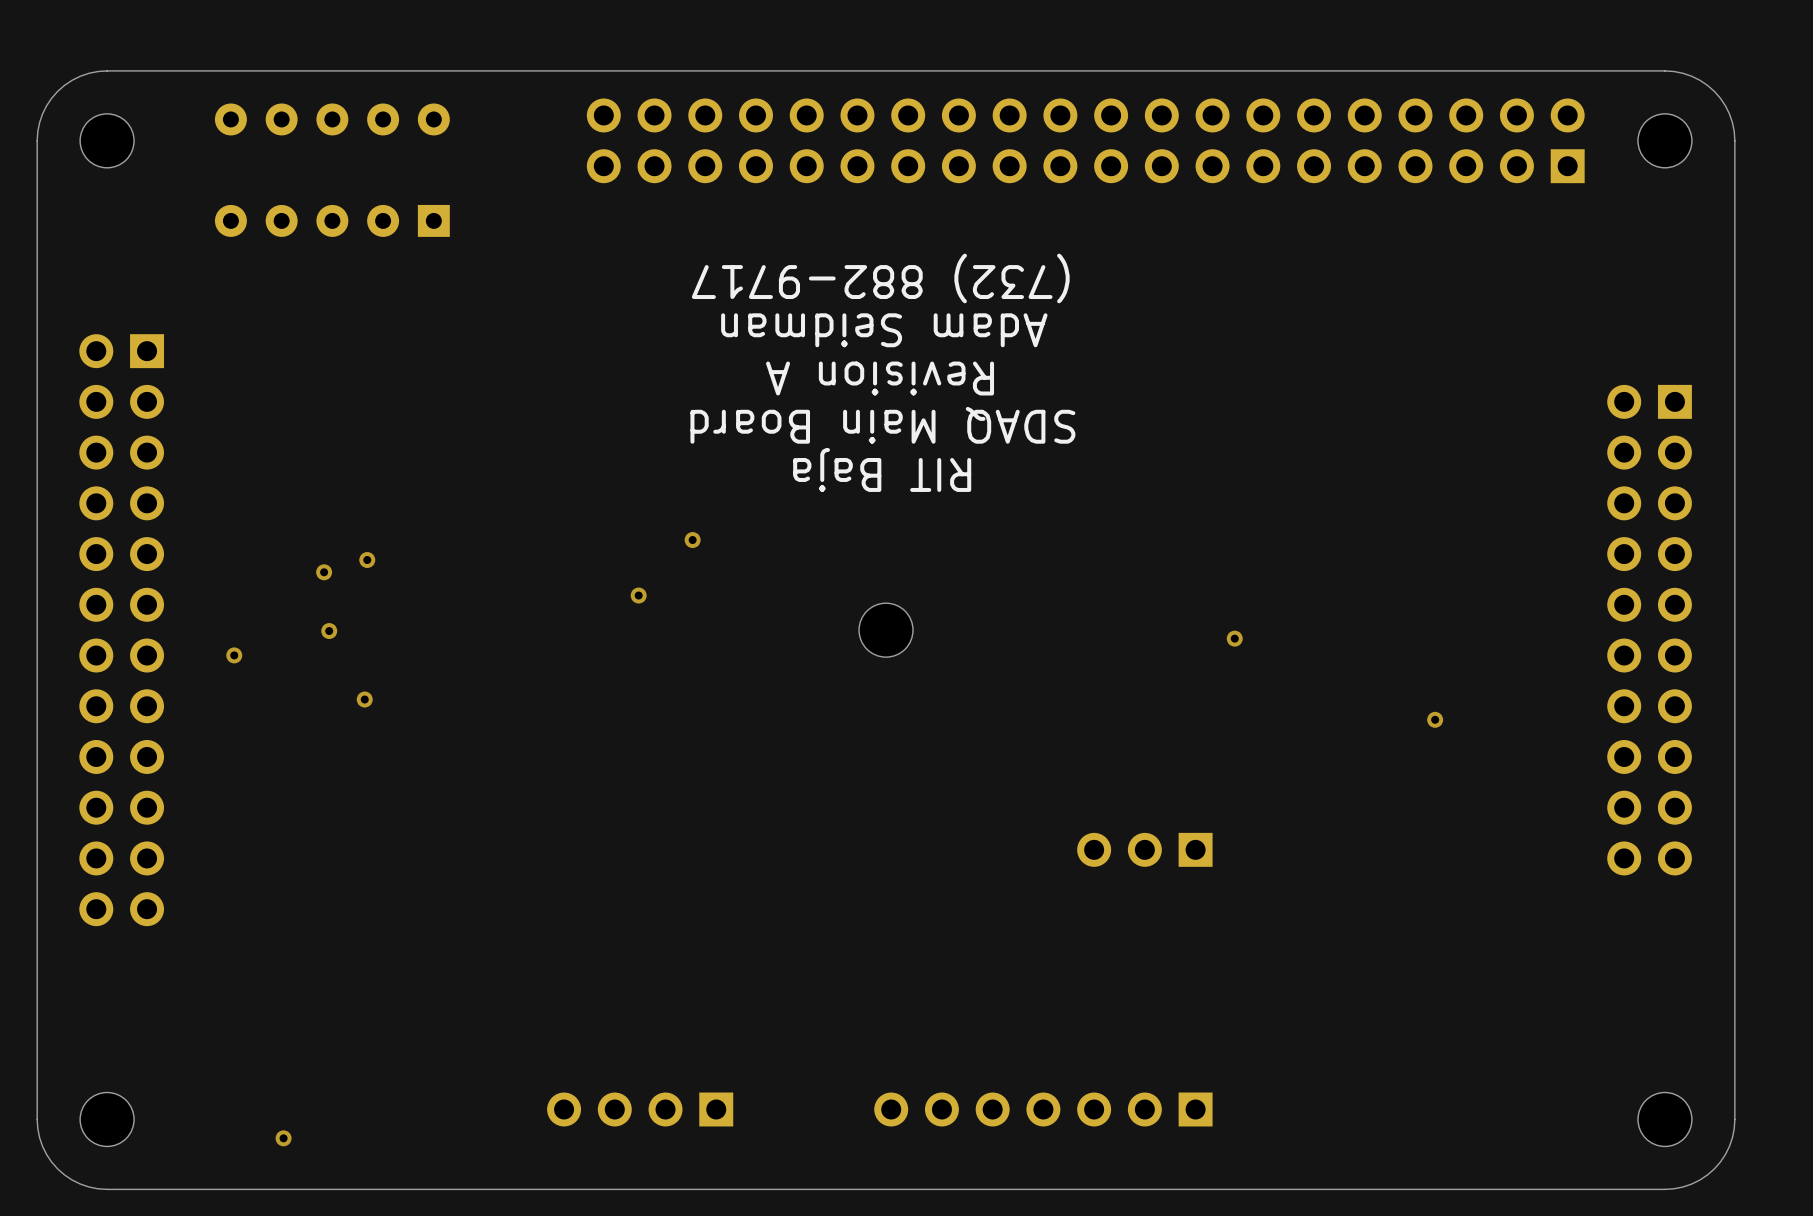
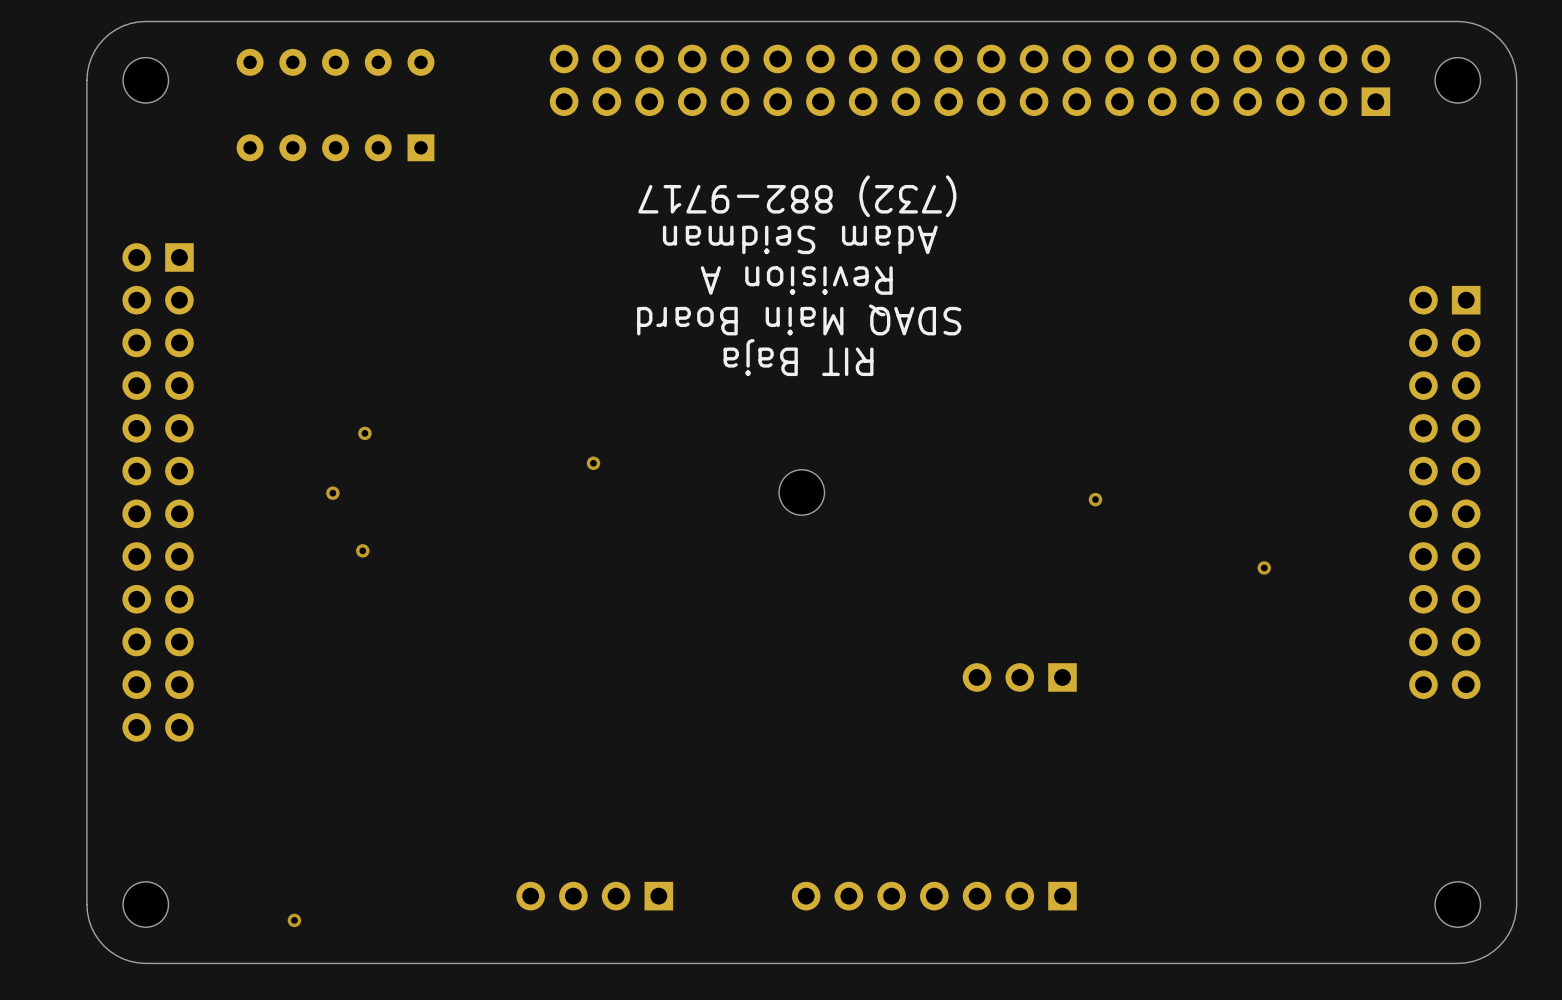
via: (692, 540) -> none
via: (324, 572) -> none
via: (234, 655) -> none

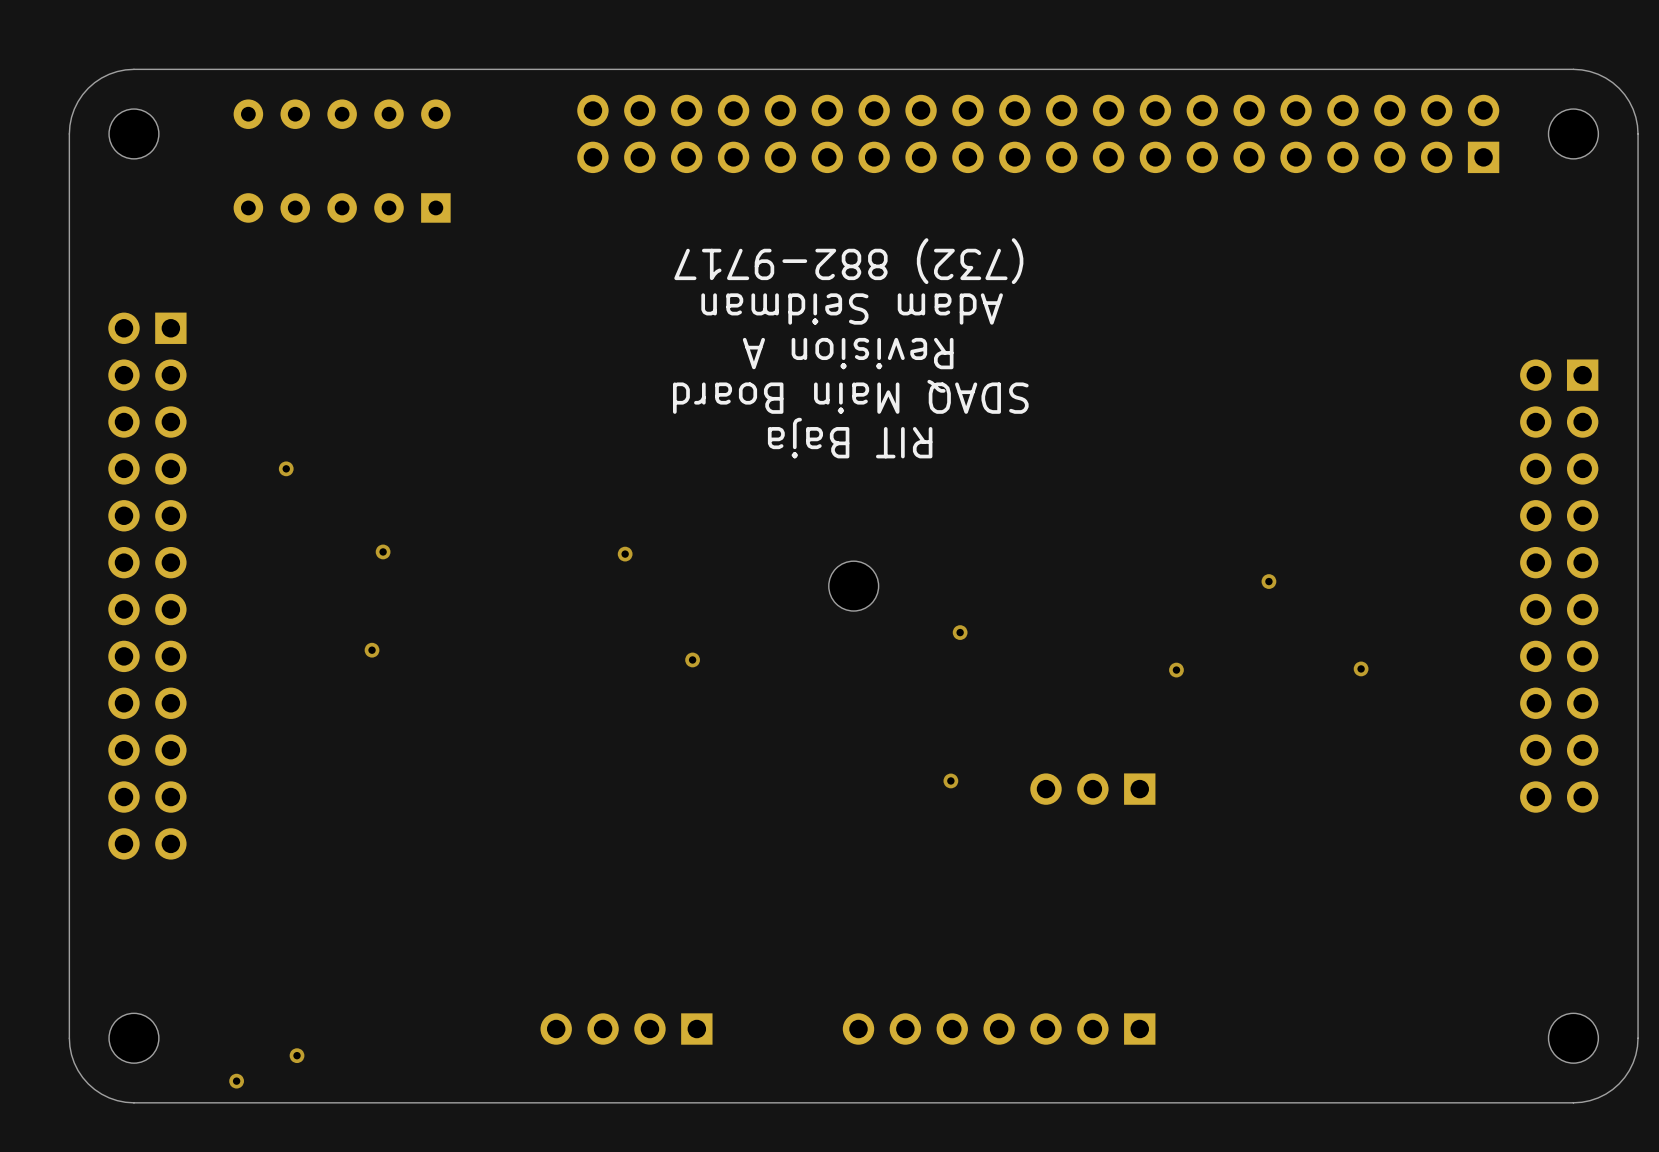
via: none -> (286, 468)
via: (364, 433) -> none
via: none -> (383, 551)
via: none -> (1268, 581)
via: (332, 493) -> none
via: (1095, 499) -> none
via: none -> (960, 632)
via: none -> (692, 659)
via: none -> (1176, 670)
via: none -> (950, 780)
via: none -> (236, 1081)

